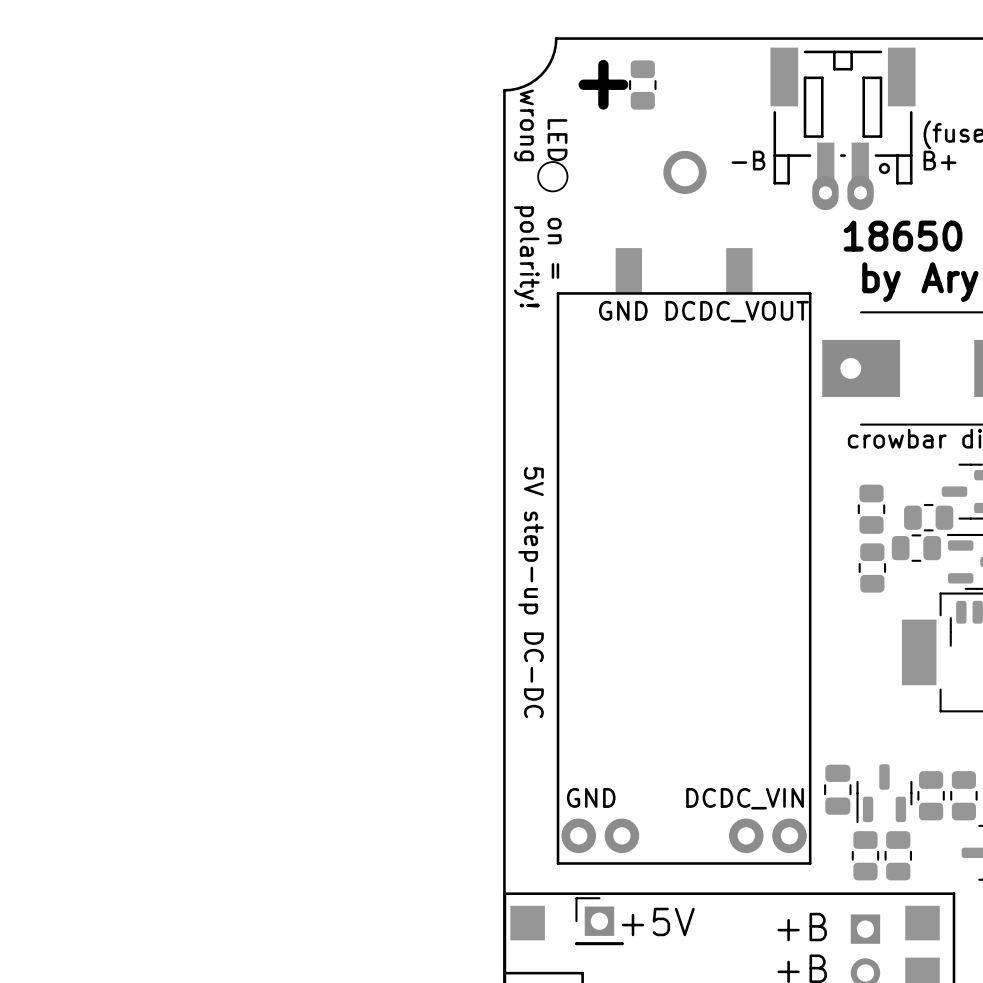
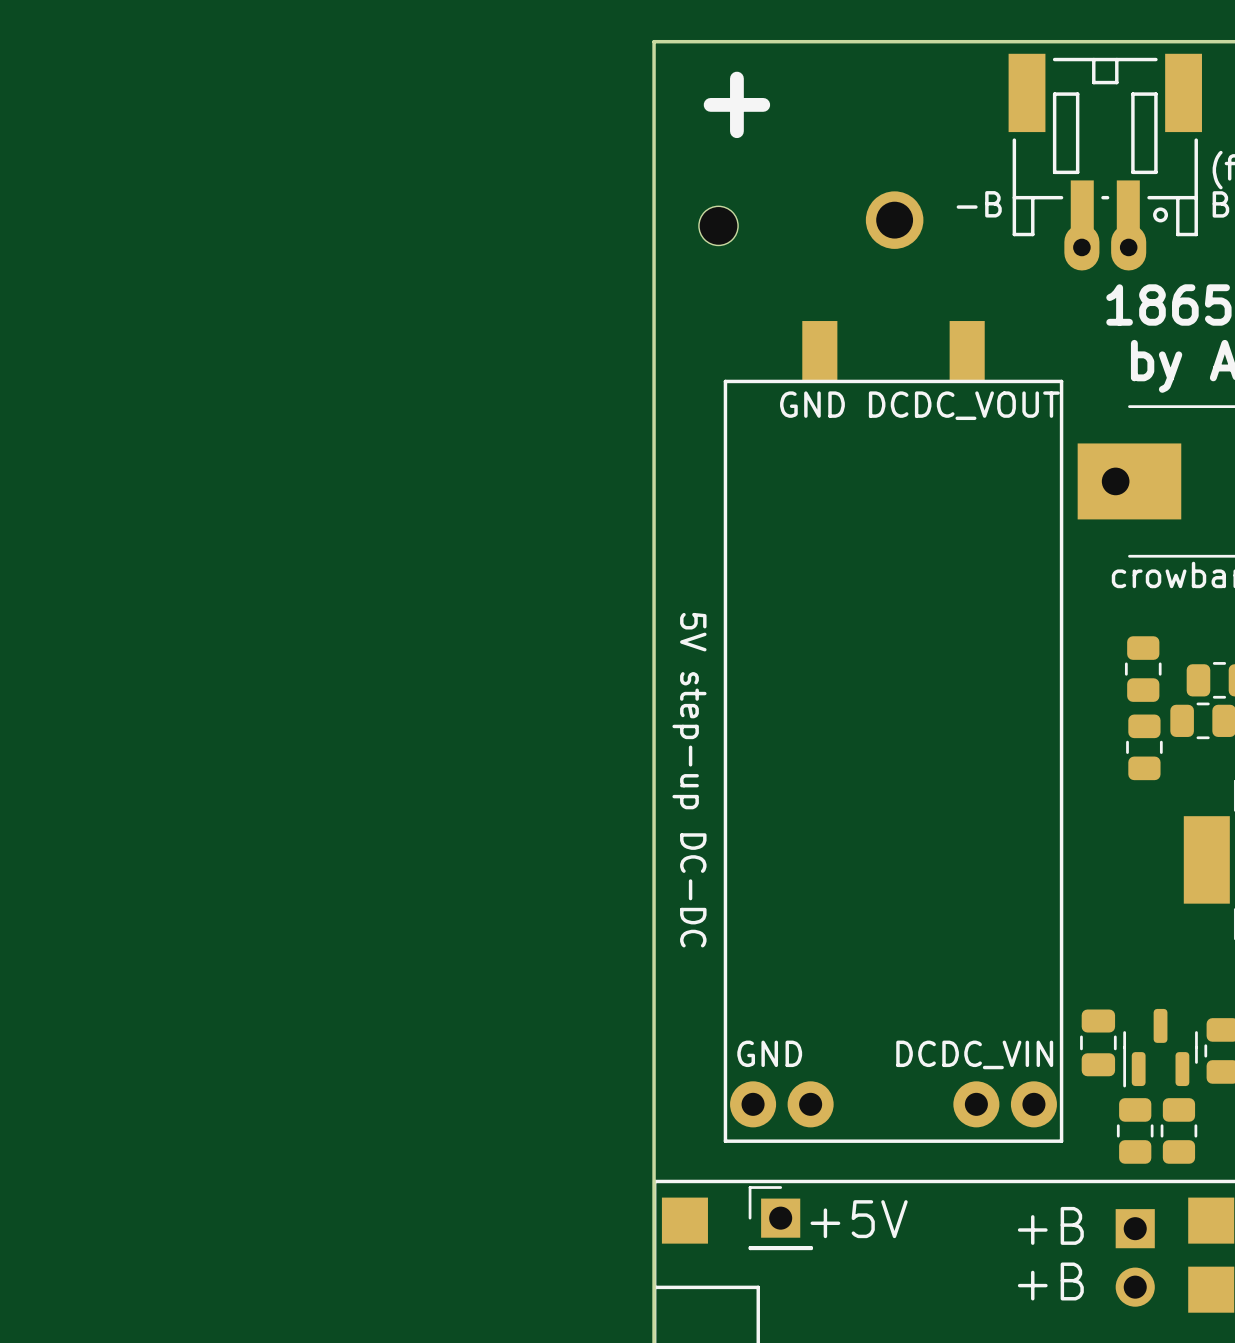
board edge: (556, 38) (552, 58) (541, 75) (524, 86) (504, 90) -> (723, 41) (654, 41) (654, 110)
text position: + (603, 84) -> + (736, 104)
part: (642, 85) -> none
text: wrong polarity! (526, 198) -> none
text: LED on = (557, 199) -> none

